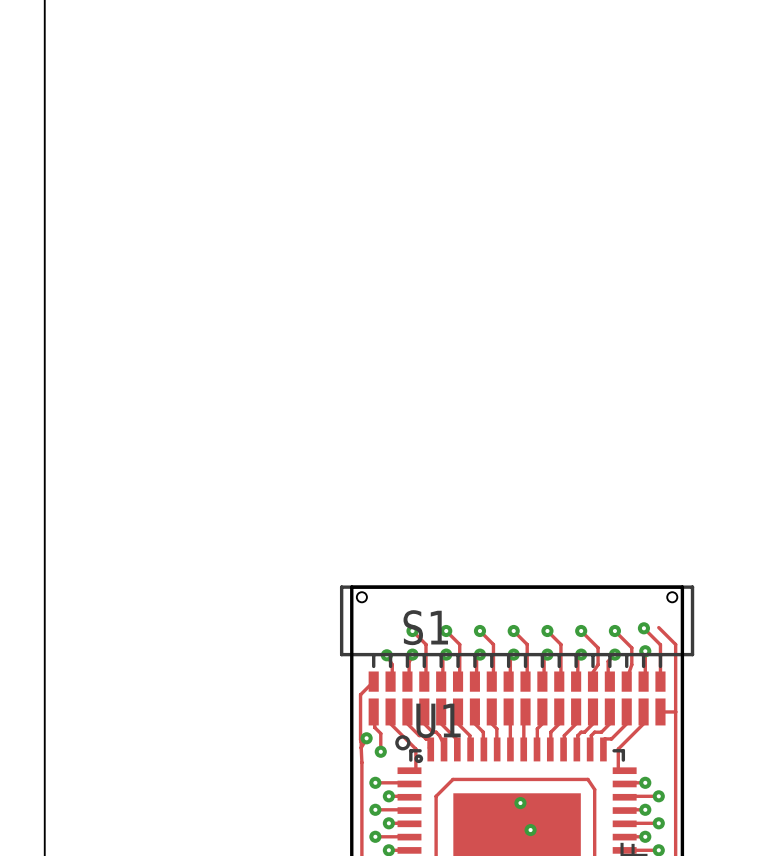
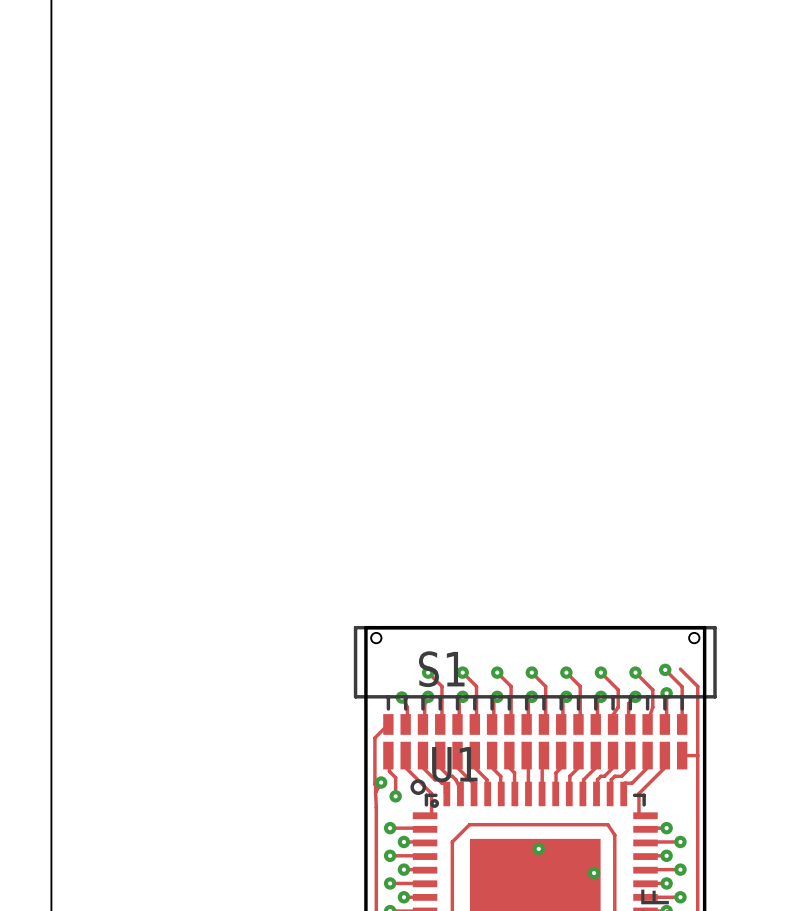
via position: (530, 830) -> (594, 873)

